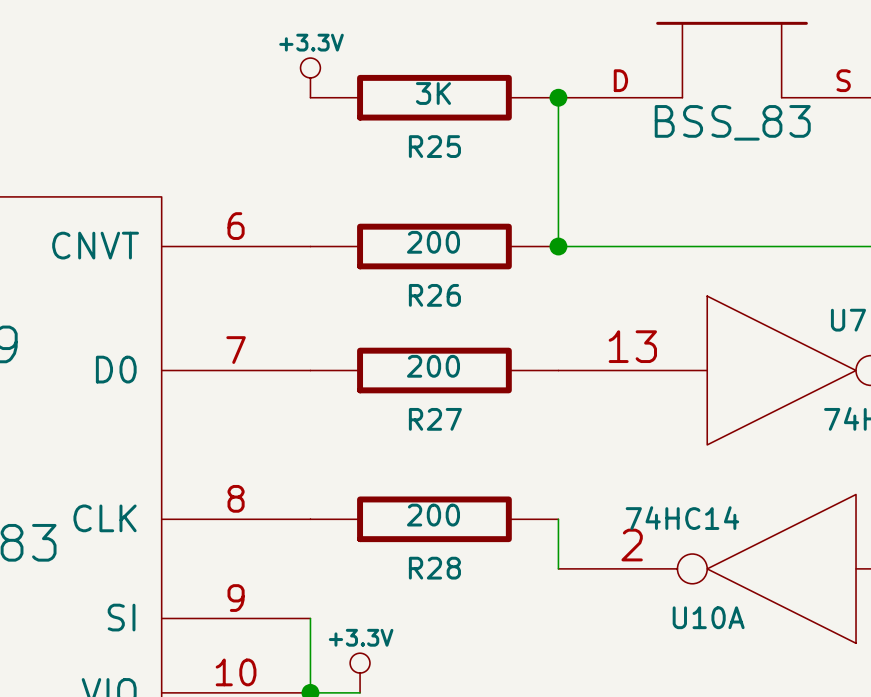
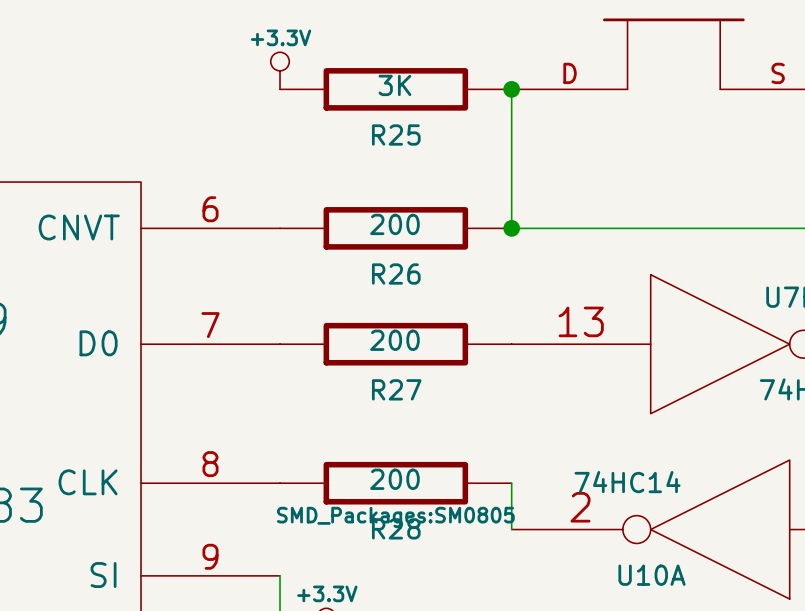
part text: BSS_83 (732, 122) -> none
R28 text: none -> SMD_Packages:SM0805 (395, 517)

